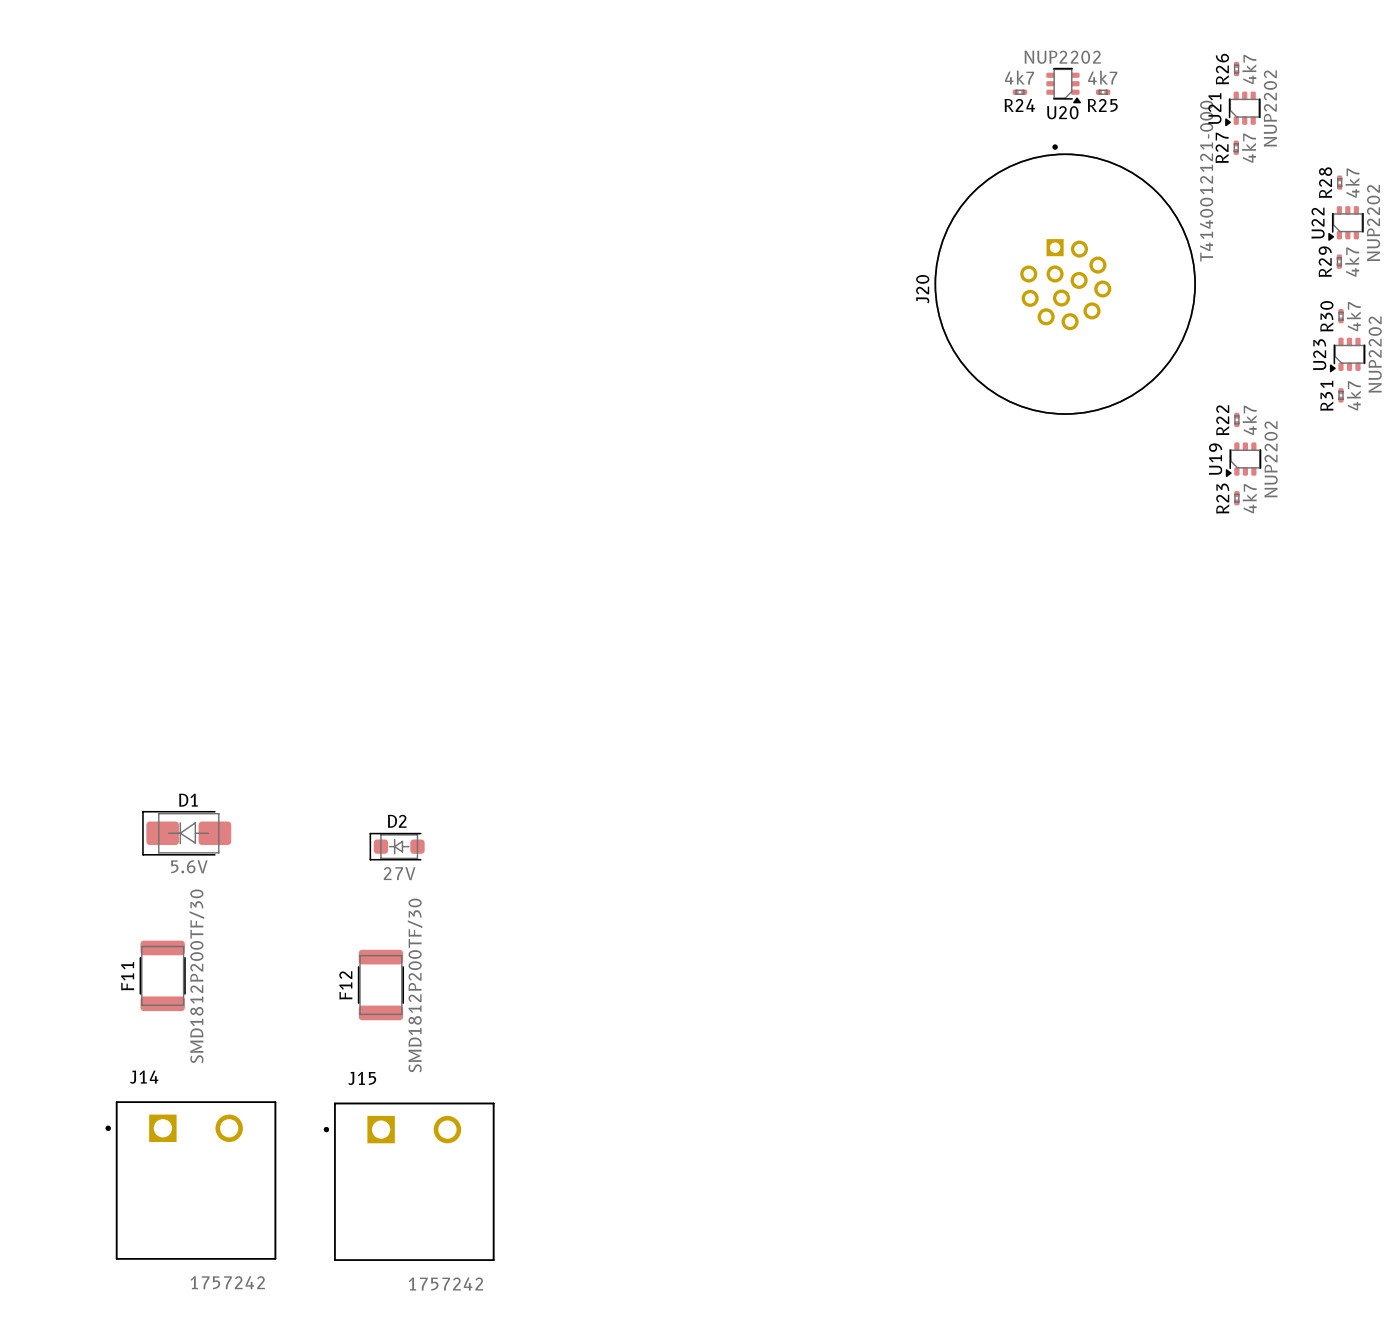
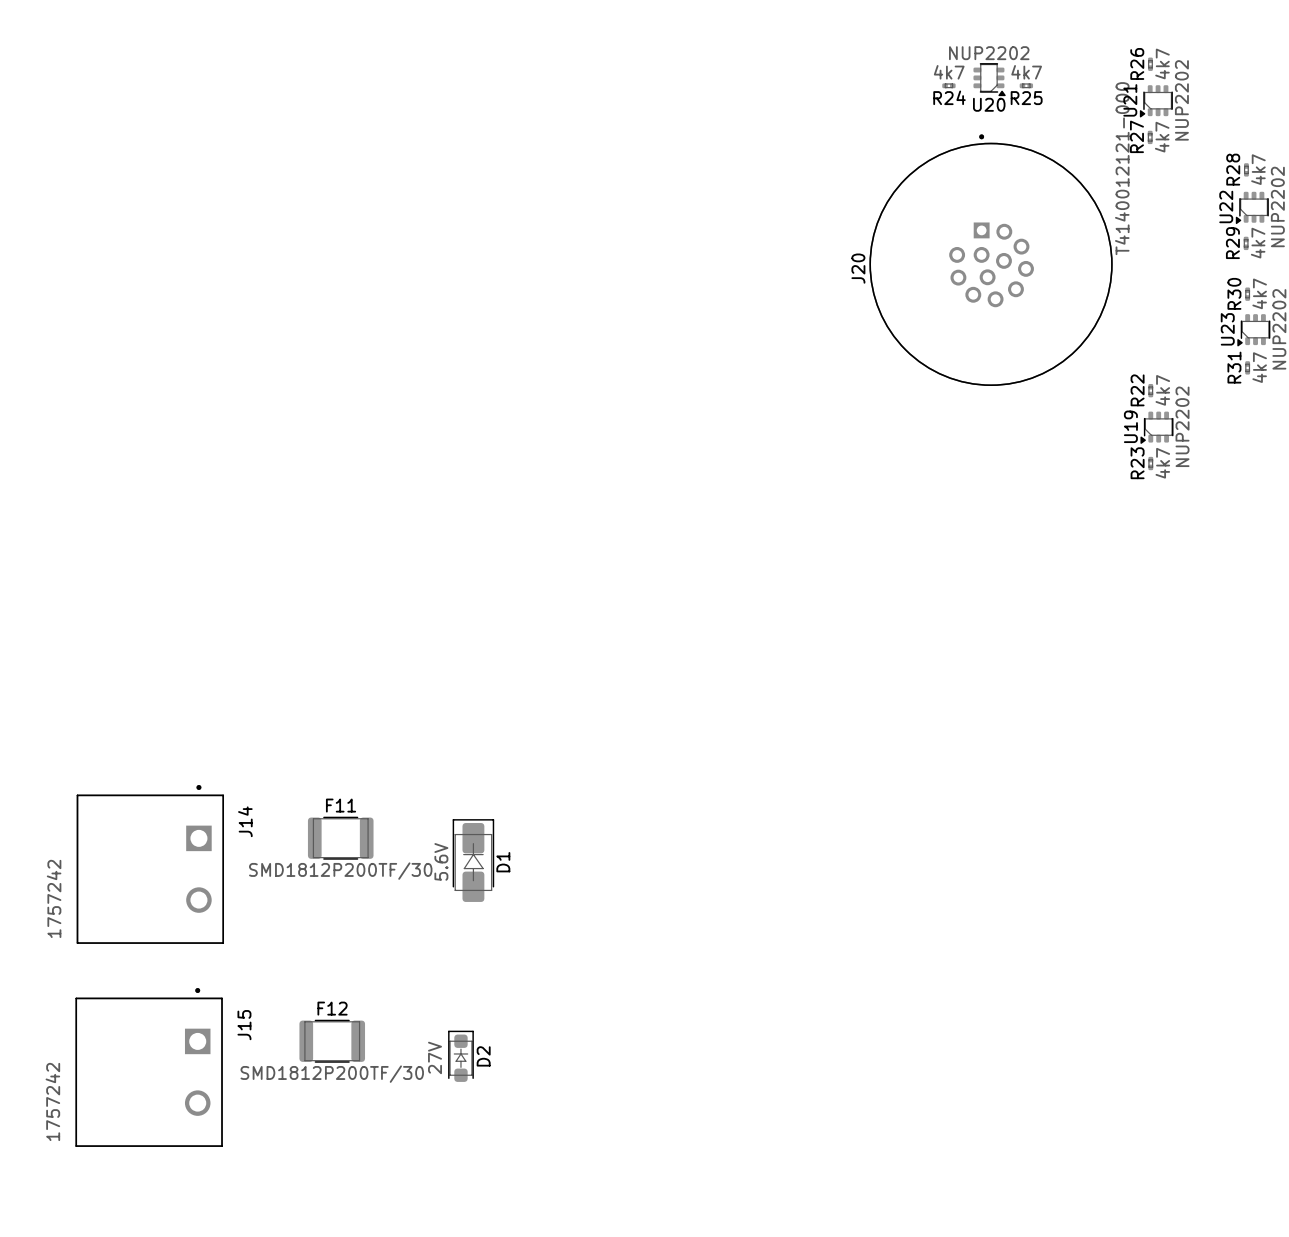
D1 rotation: 0° (186, 833) -> 90° clockwise (473, 860)
D1 position: (186, 833) -> (473, 860)
D2 rotation: 0° (397, 846) -> 90° clockwise (460, 1056)
D2 position: (397, 846) -> (460, 1056)
F11 rotation: 0° (162, 975) -> 90° clockwise (340, 838)
F11 position: (162, 975) -> (340, 838)
F12 rotation: 0° (380, 985) -> 90° clockwise (332, 1041)
F12 position: (380, 985) -> (332, 1041)
J14 rotation: 0° (190, 1180) -> 90° clockwise (150, 864)
J14 position: (190, 1180) -> (150, 864)
J15 rotation: 0° (409, 1181) -> 90° clockwise (149, 1067)
J15 position: (409, 1181) -> (149, 1067)

